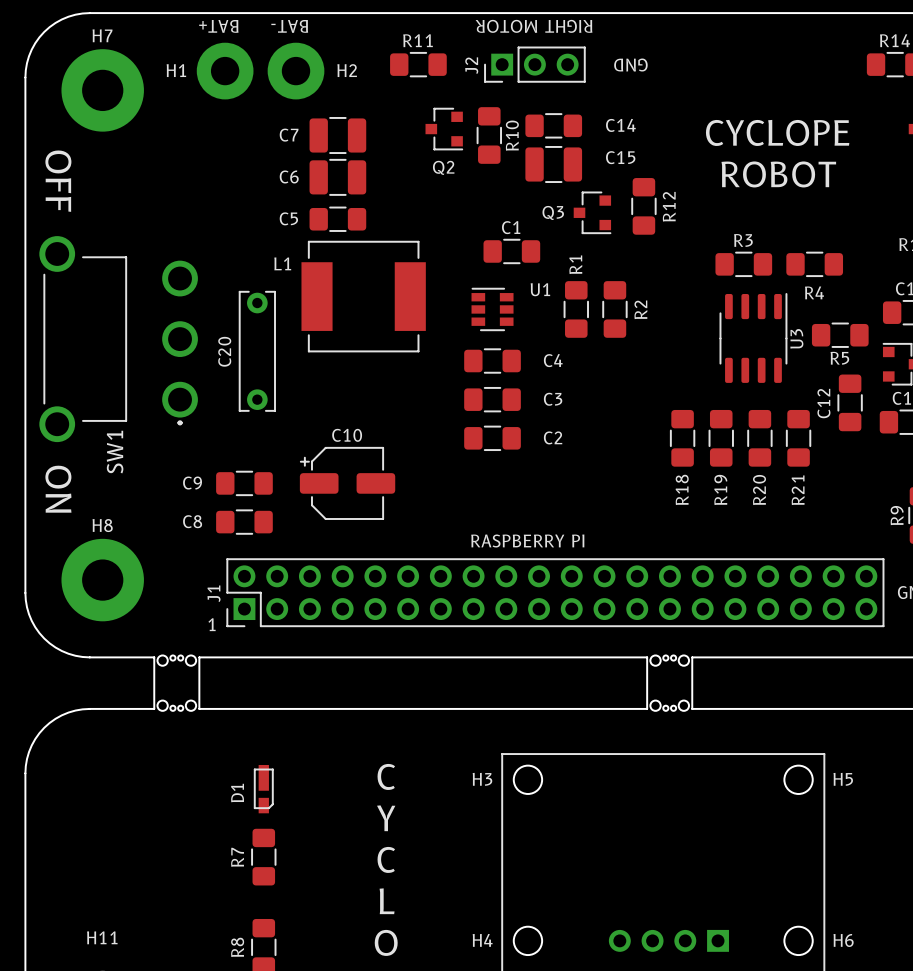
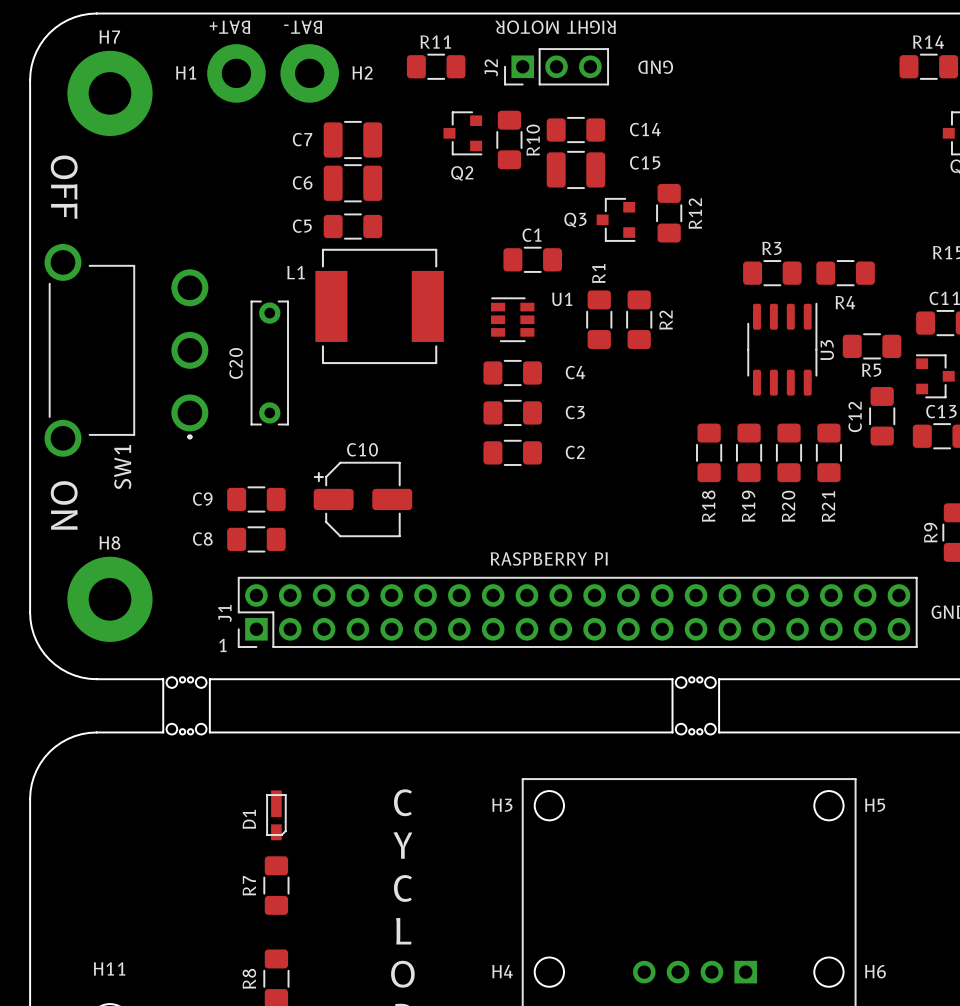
text: CYCLOPE (777, 132) -> none
text: ROBOT (778, 174) -> none

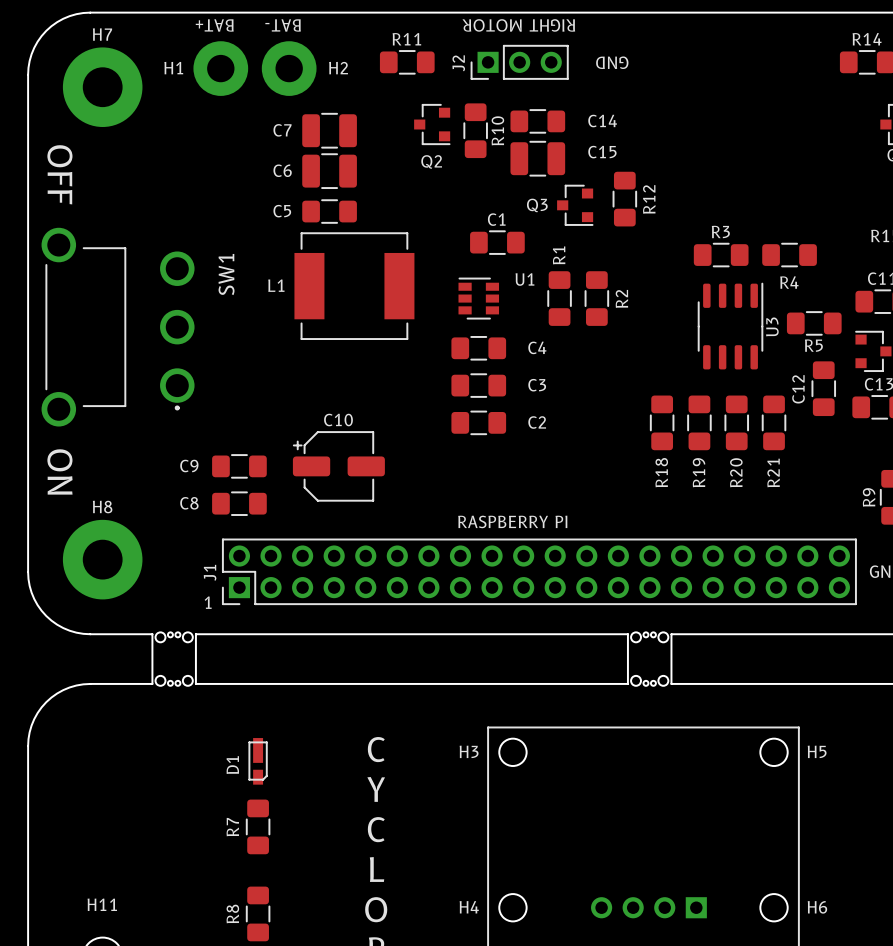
L1 name position: L1 (295, 272) -> L1 (276, 285)
C20: (269, 363) -> none
SW1 name position: SW1 (122, 467) -> SW1 (226, 274)

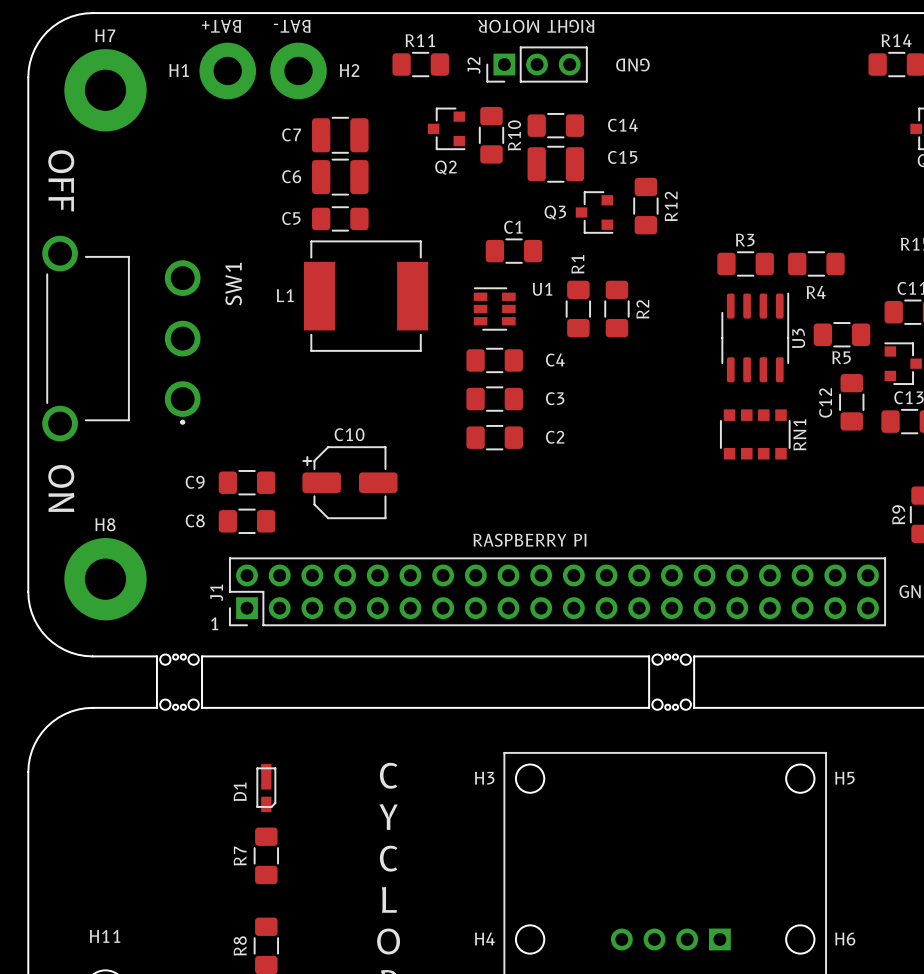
RN1: none -> (755, 434)
R18: (662, 422) -> none
R19: (699, 422) -> none
R20: (736, 422) -> none
R21: (774, 422) -> none

